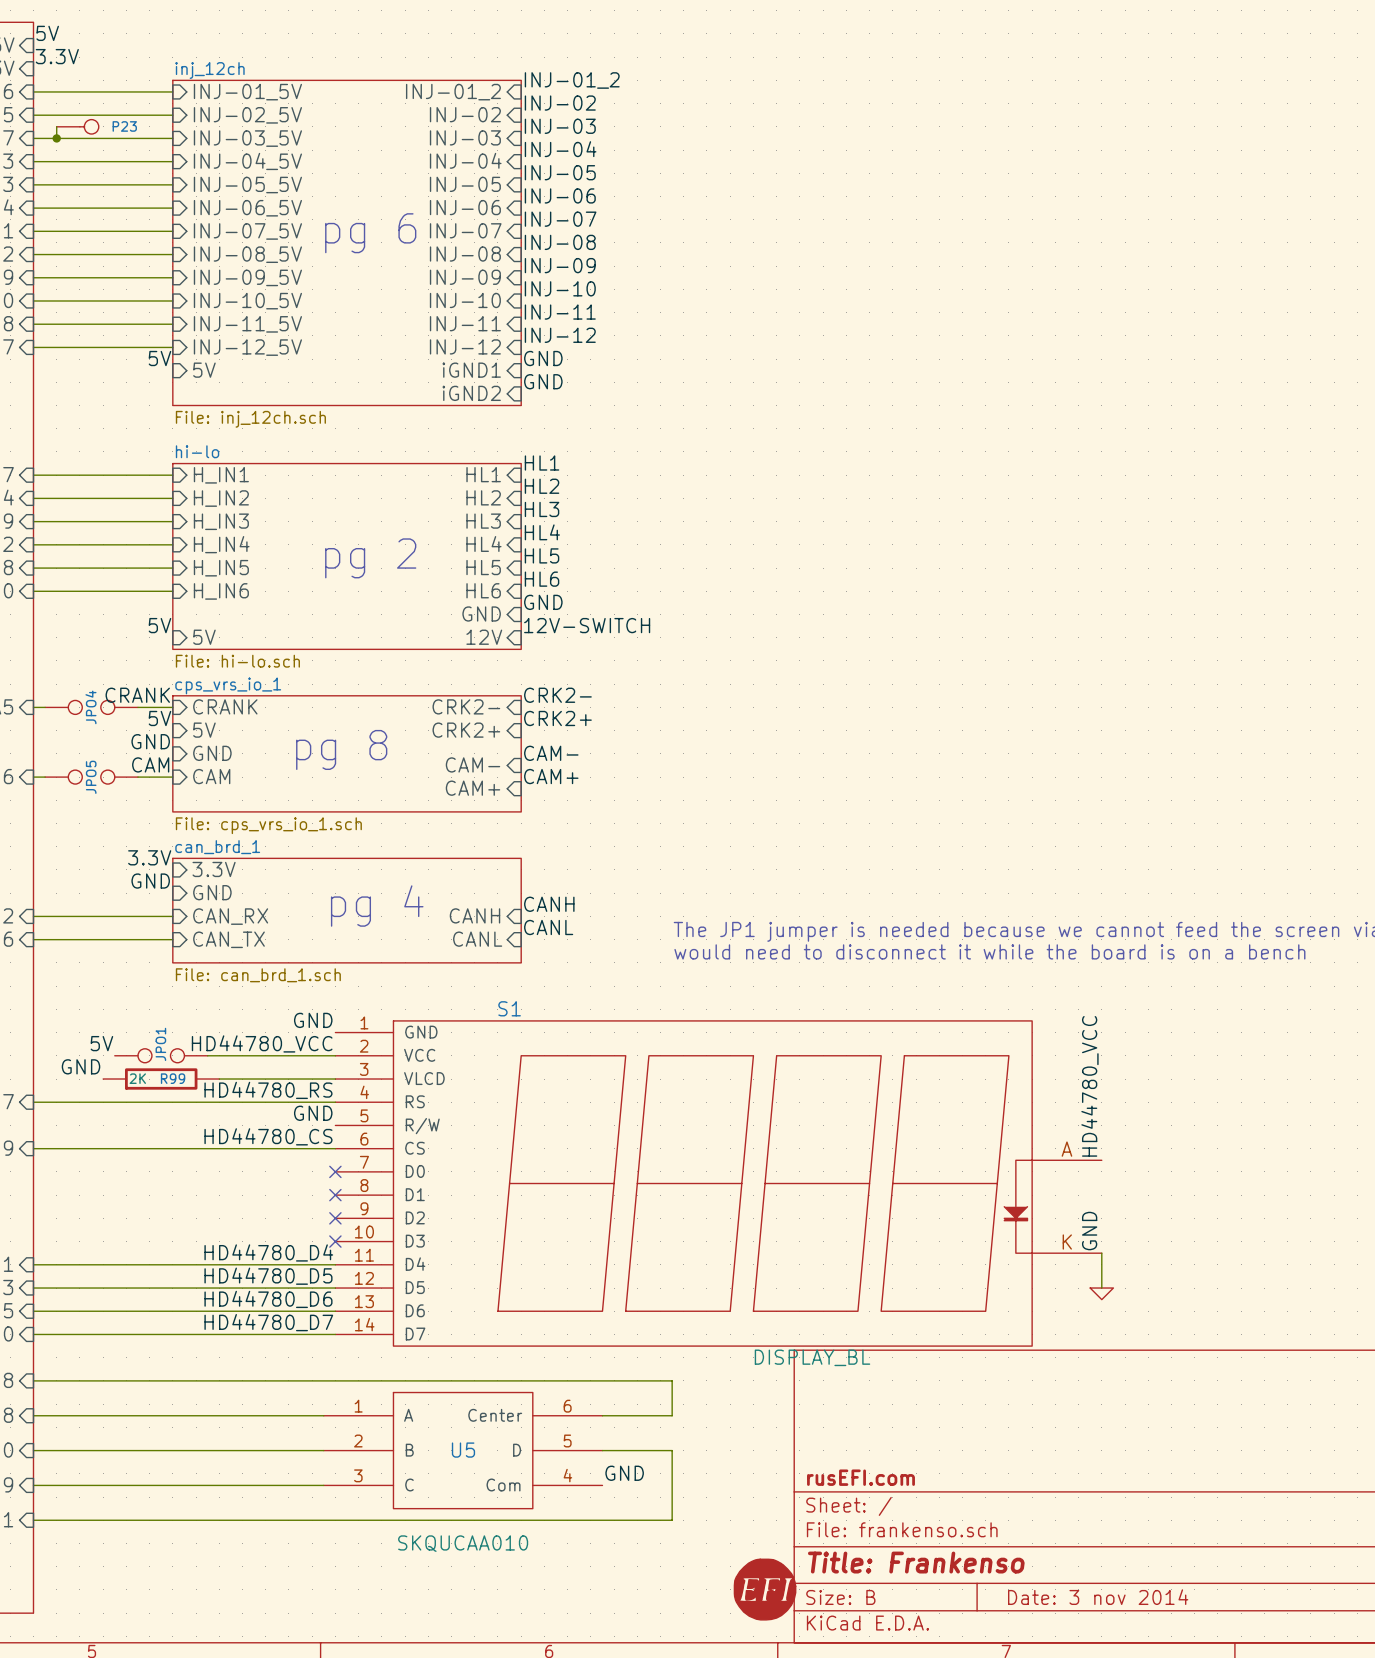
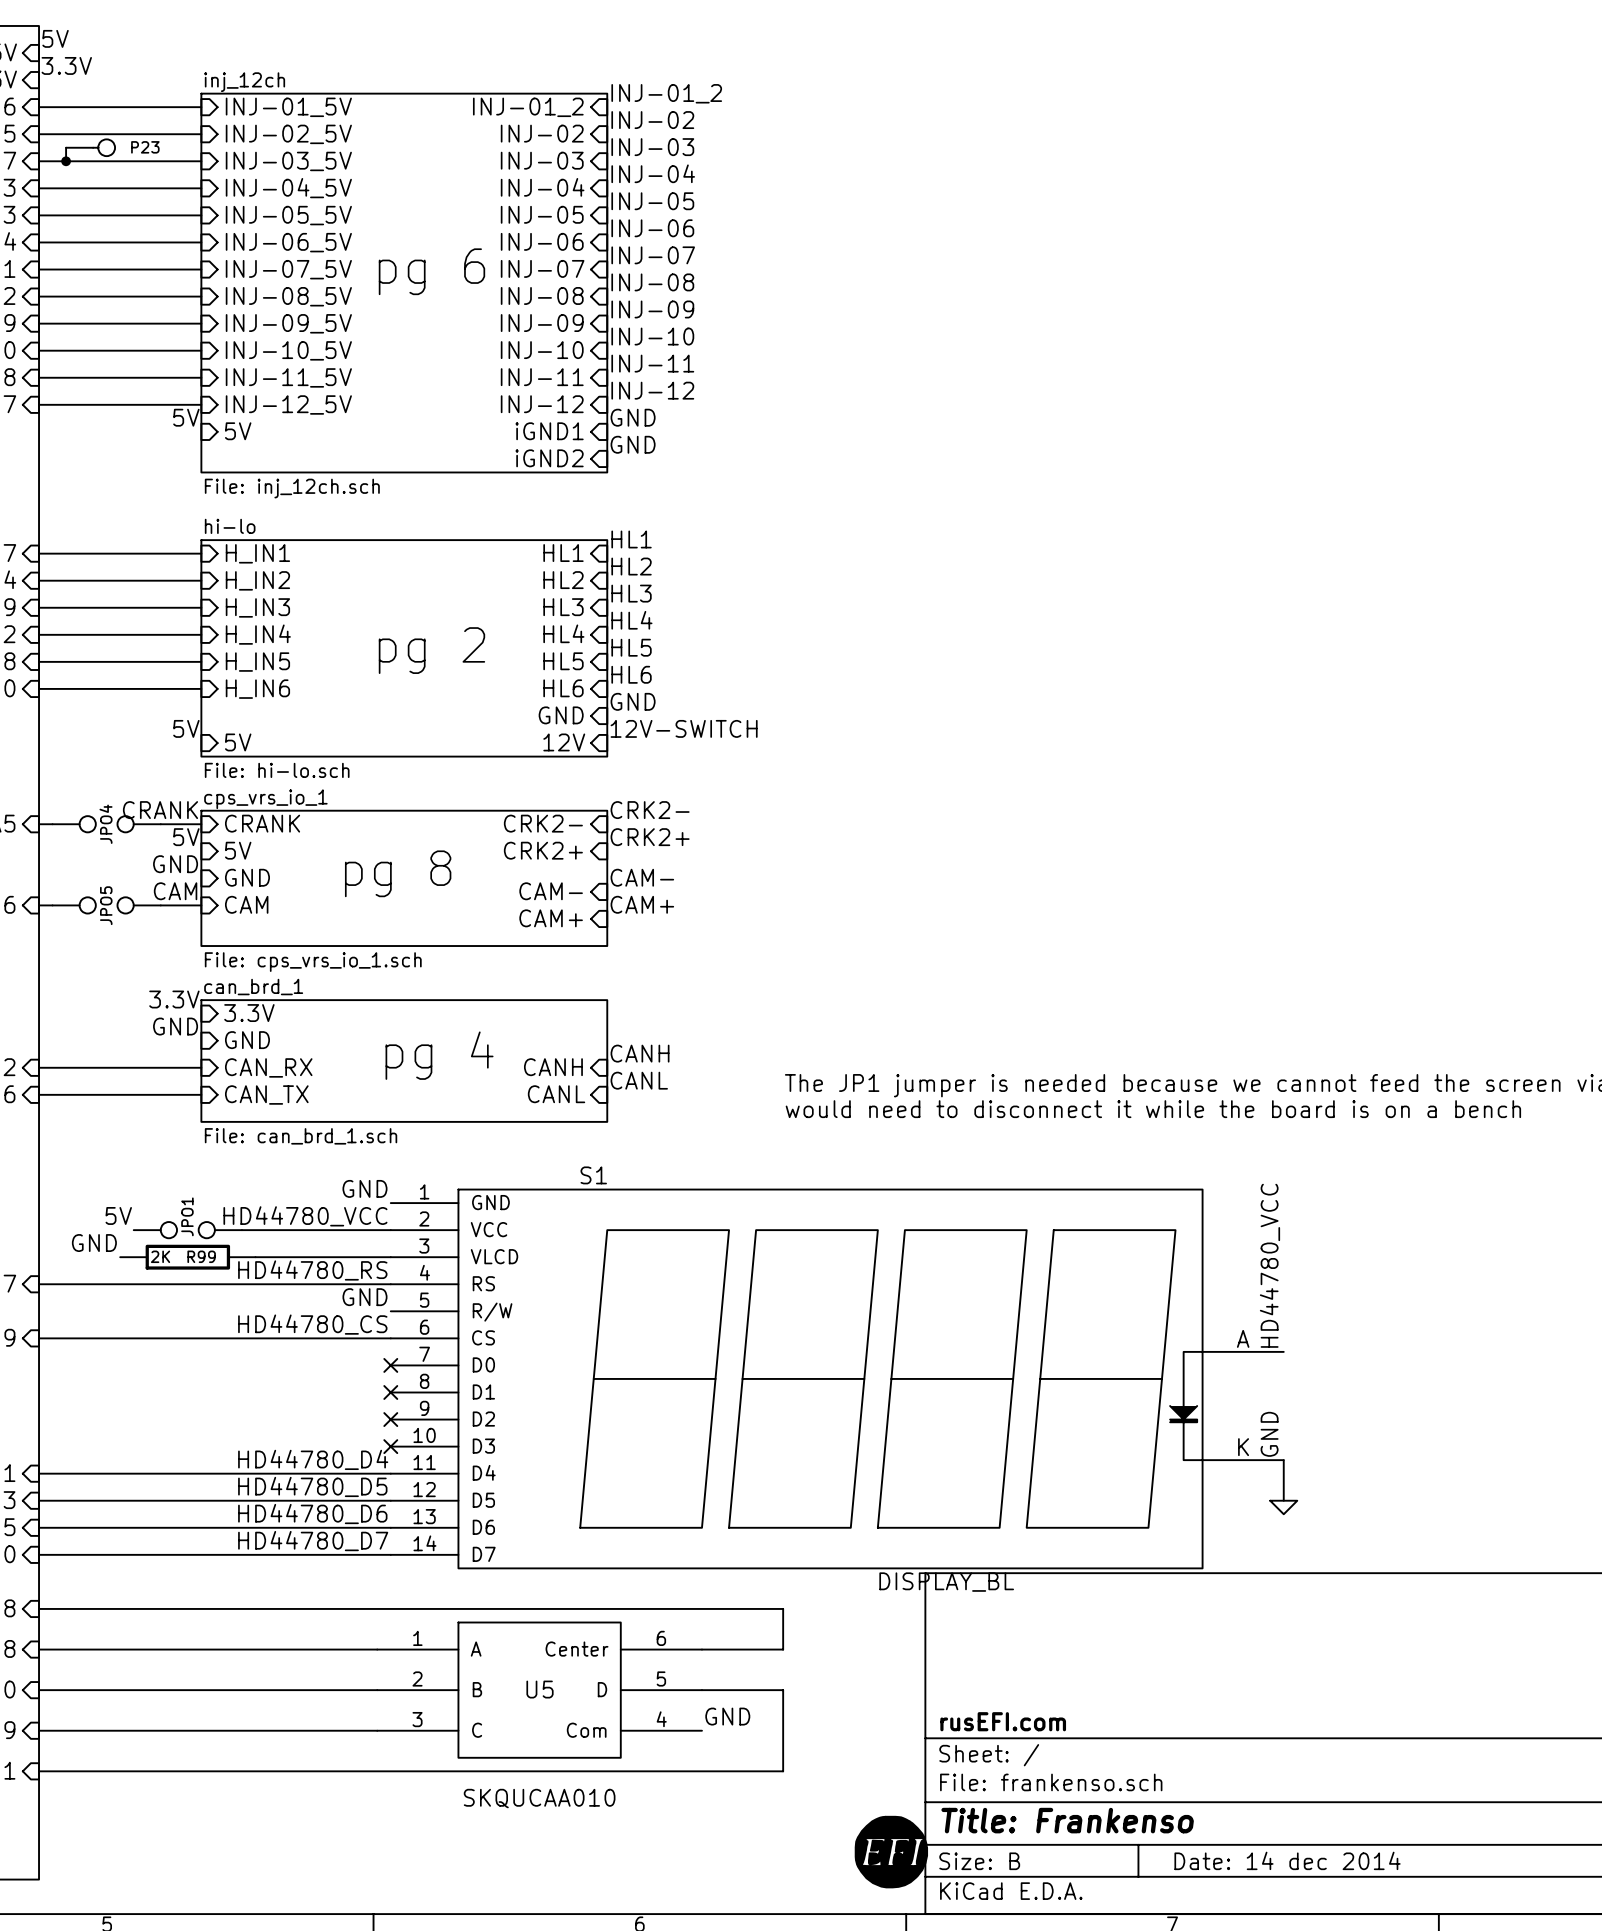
title block: Date: 3 nov 2014 (1098, 1597) -> Date: 14 dec 2014 (1287, 1860)

